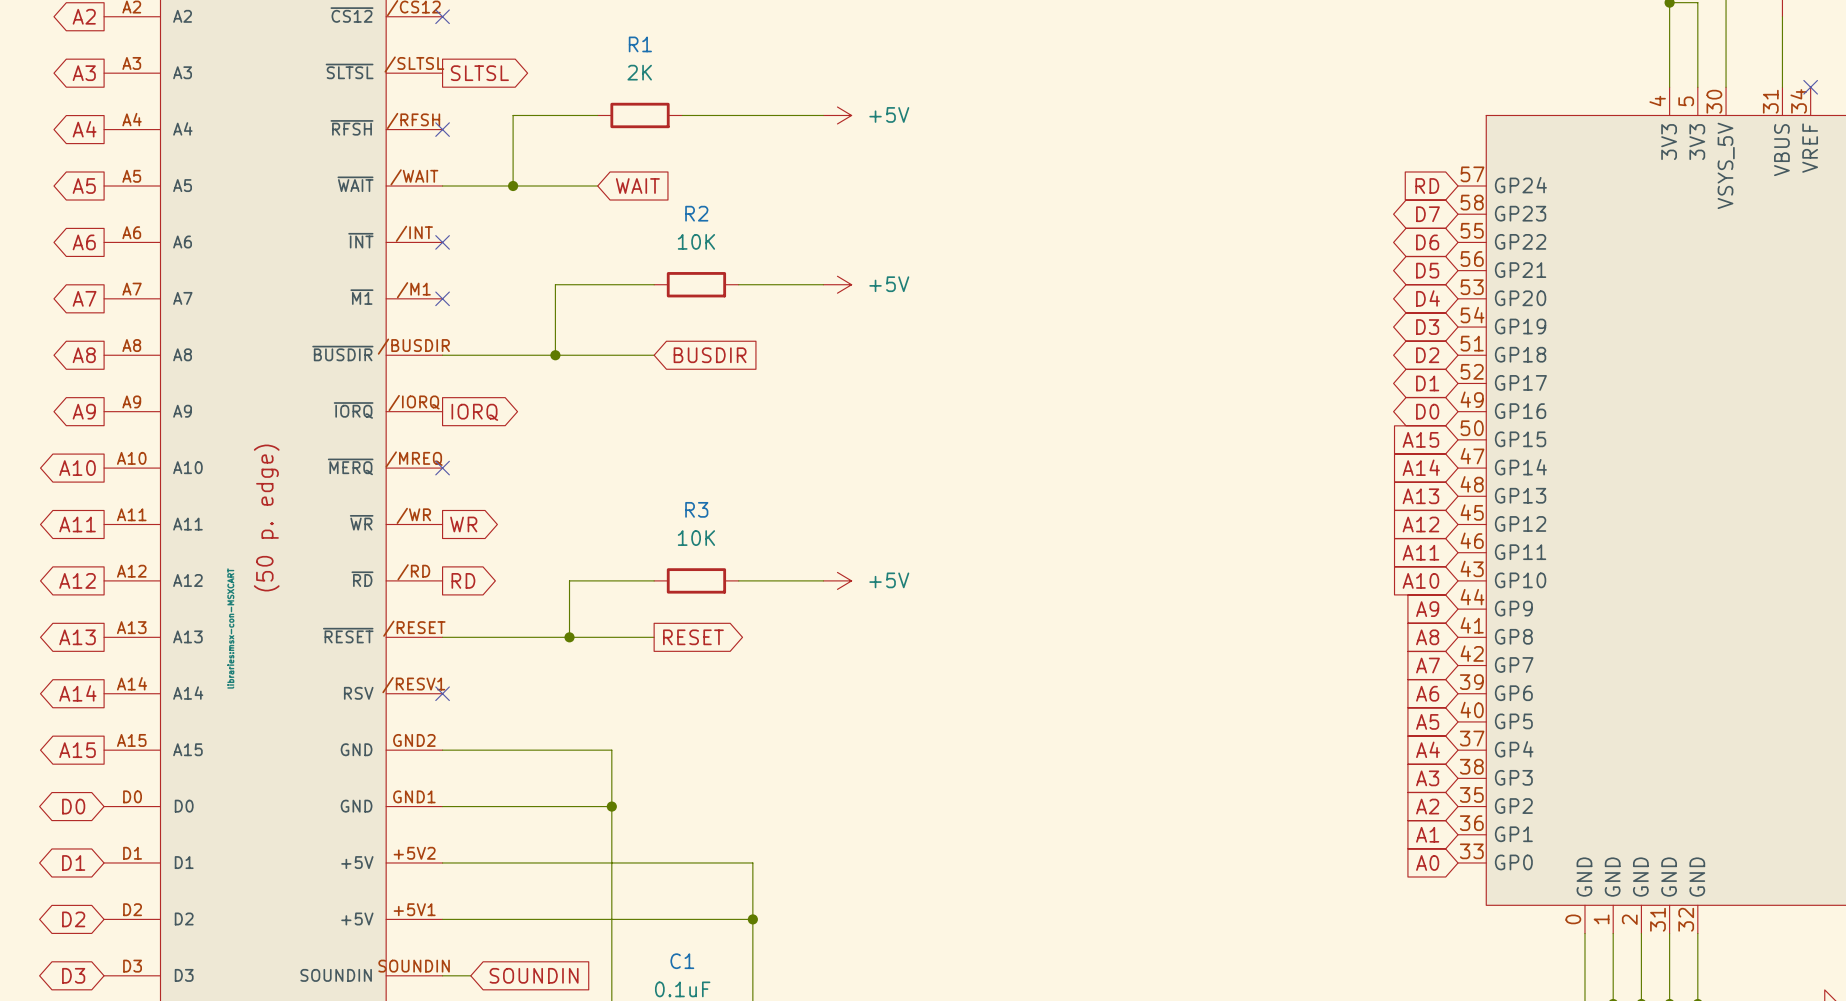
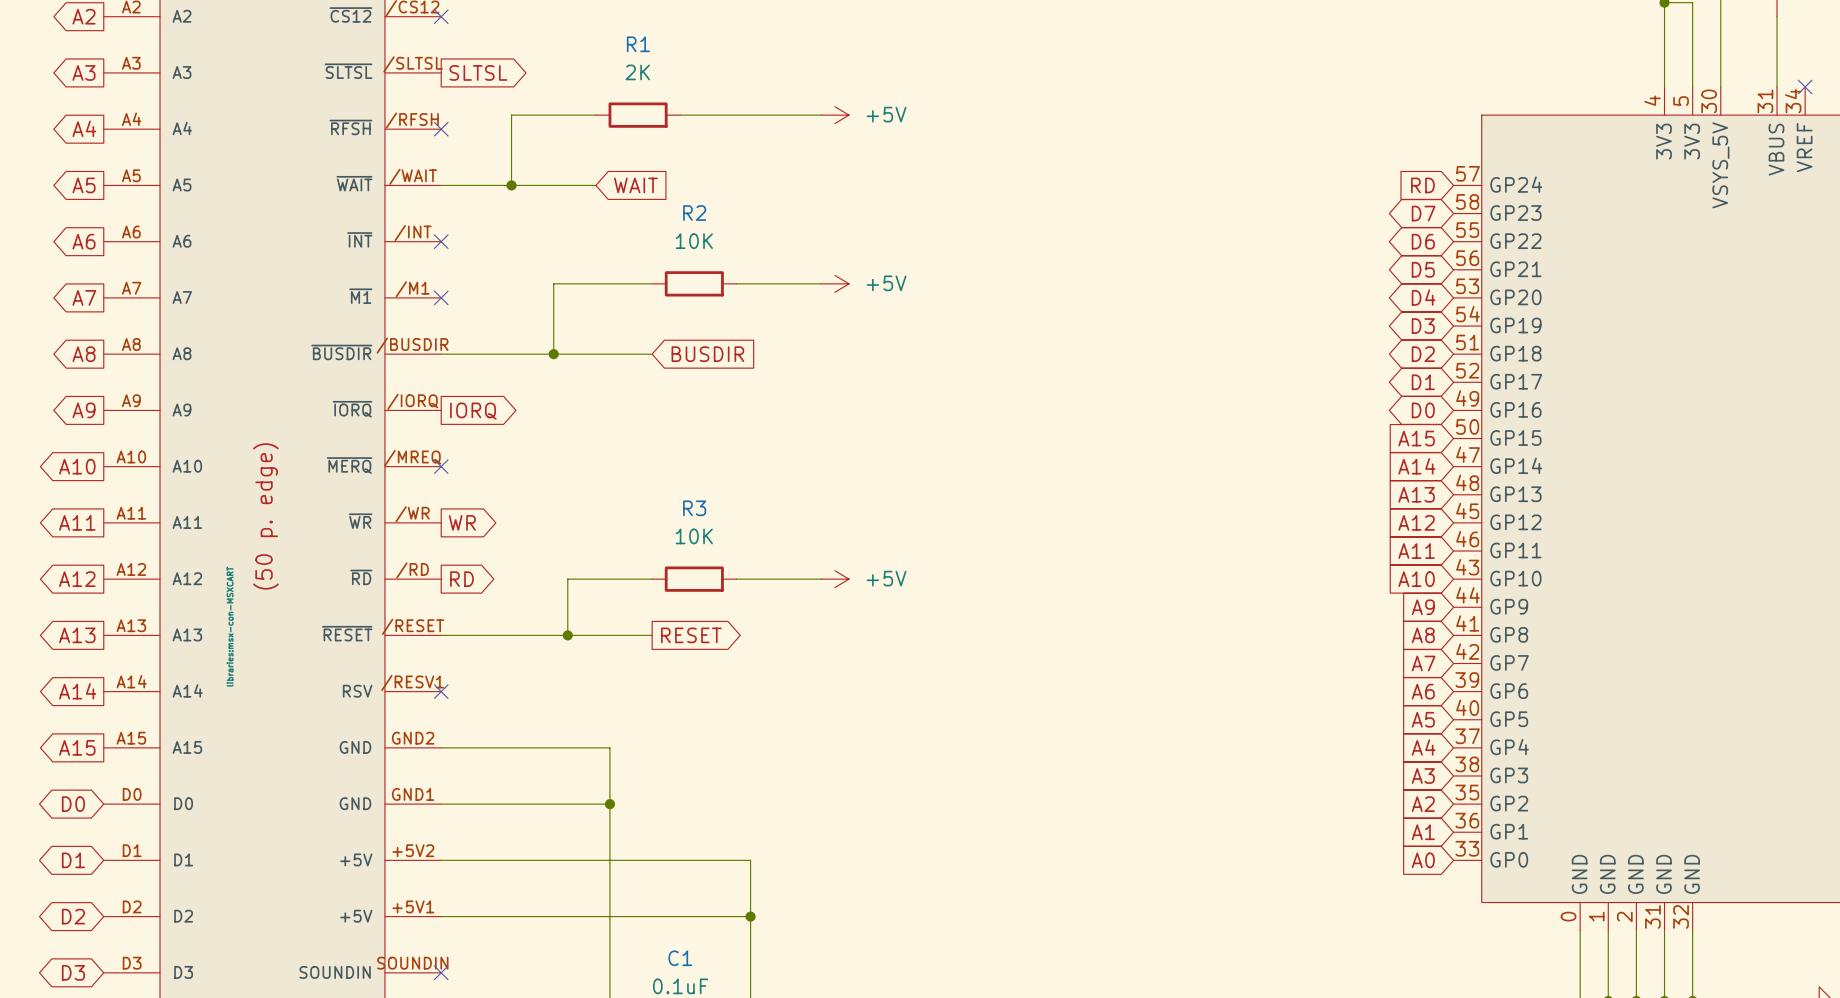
wire: (442, 975) (470, 975) -> none
no-connect mark: none -> (441, 972)
global label: SOUNDIN (534, 975) -> none

